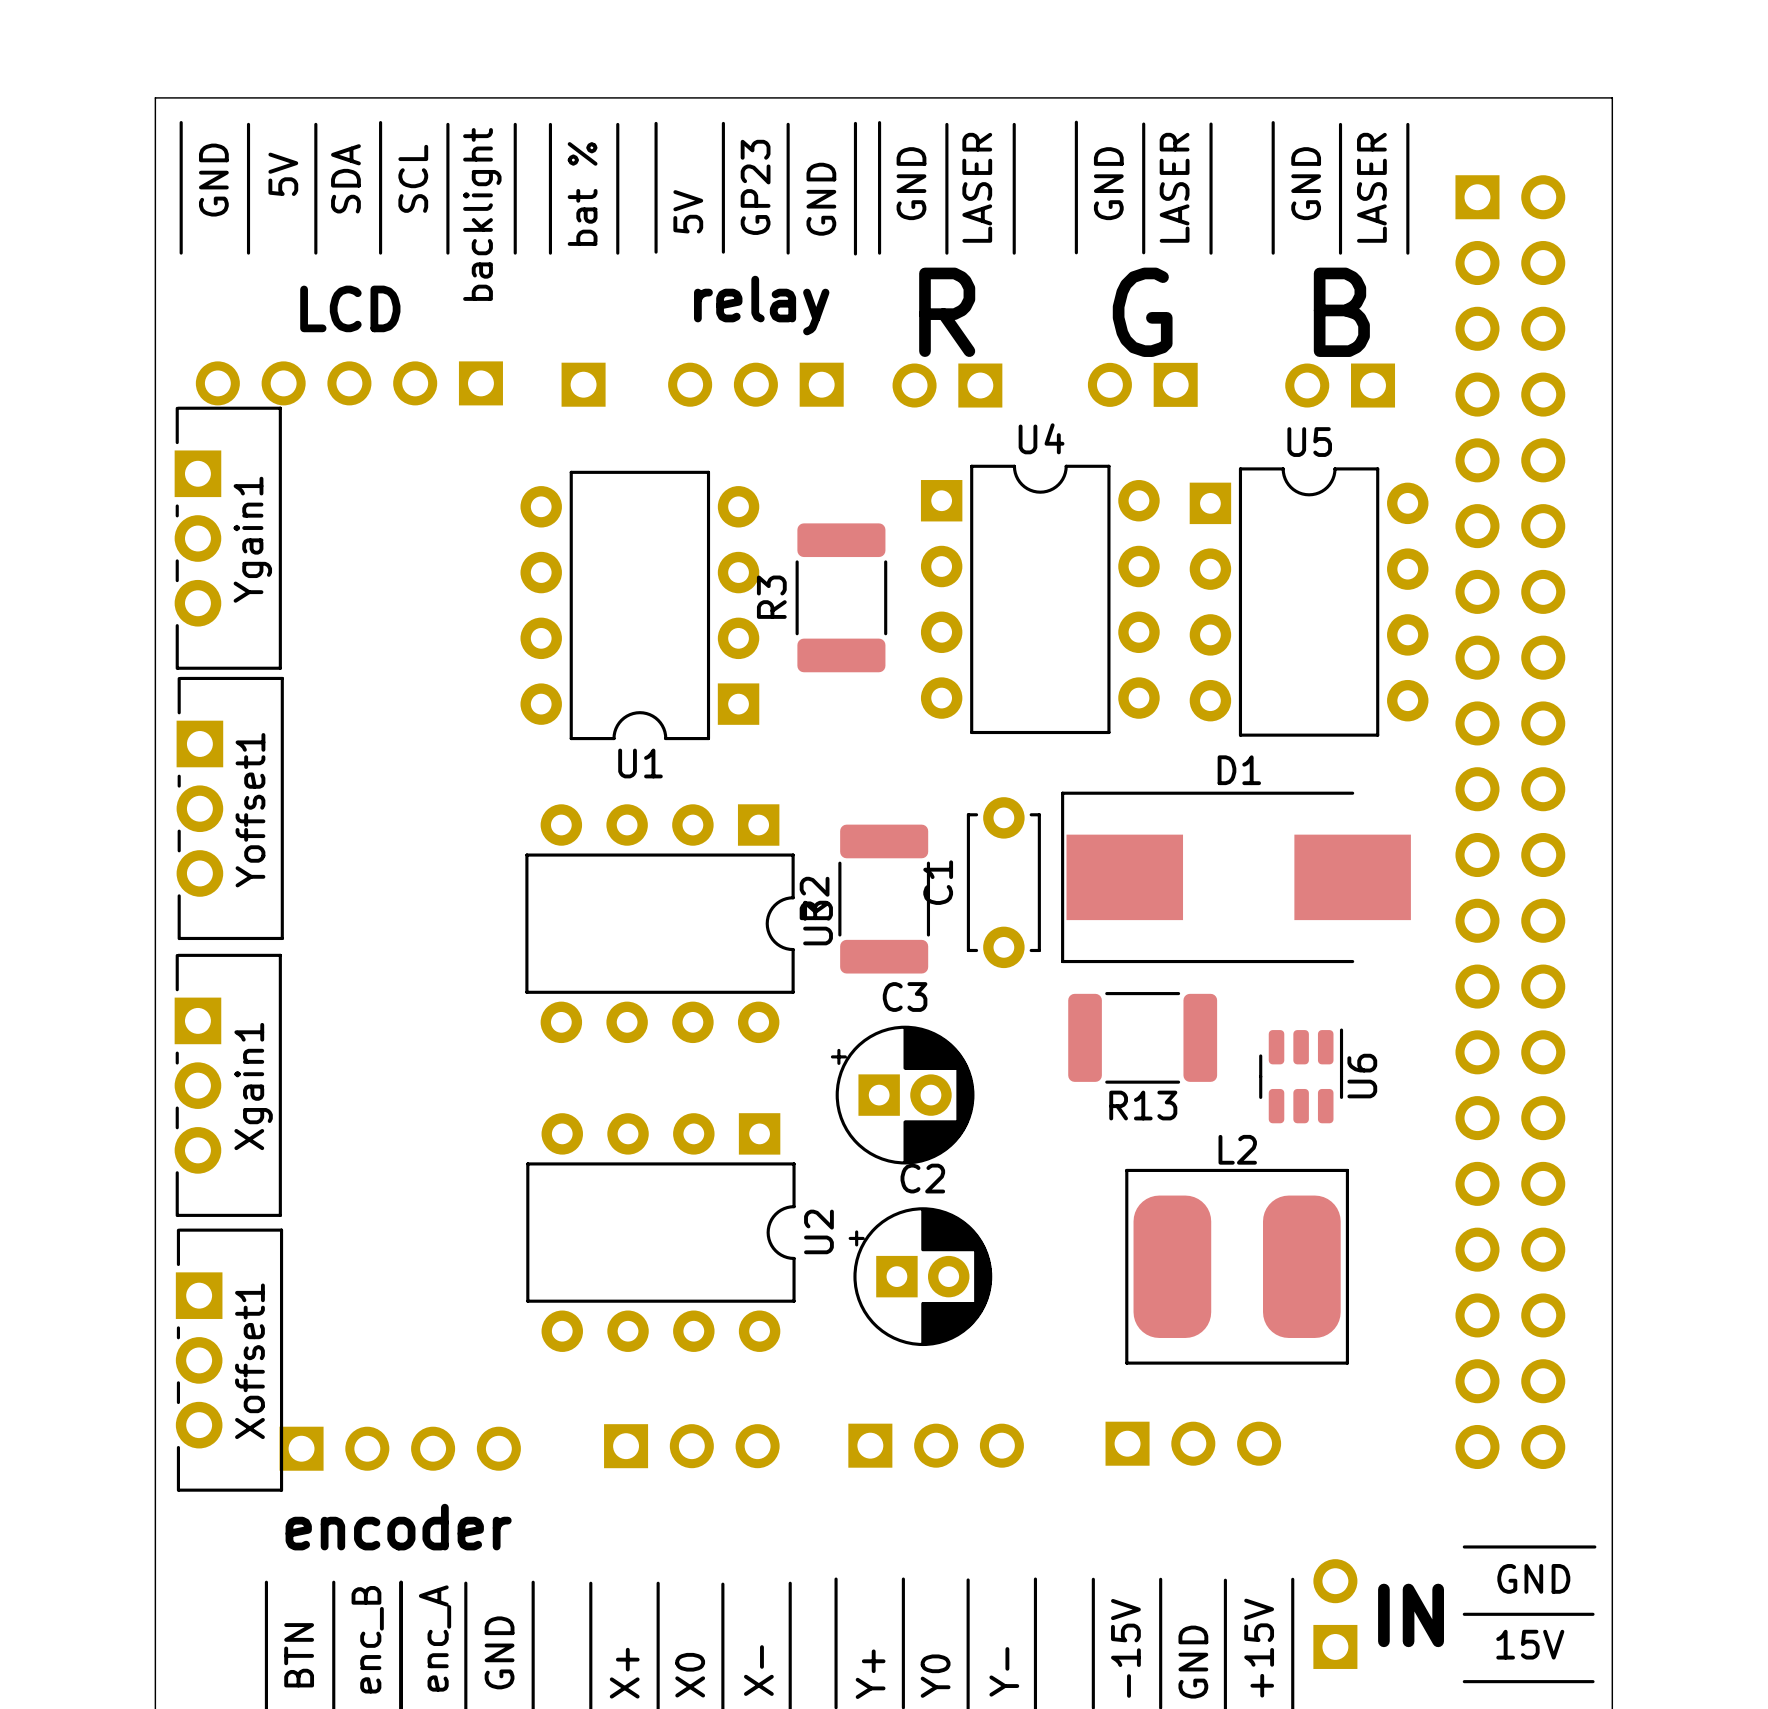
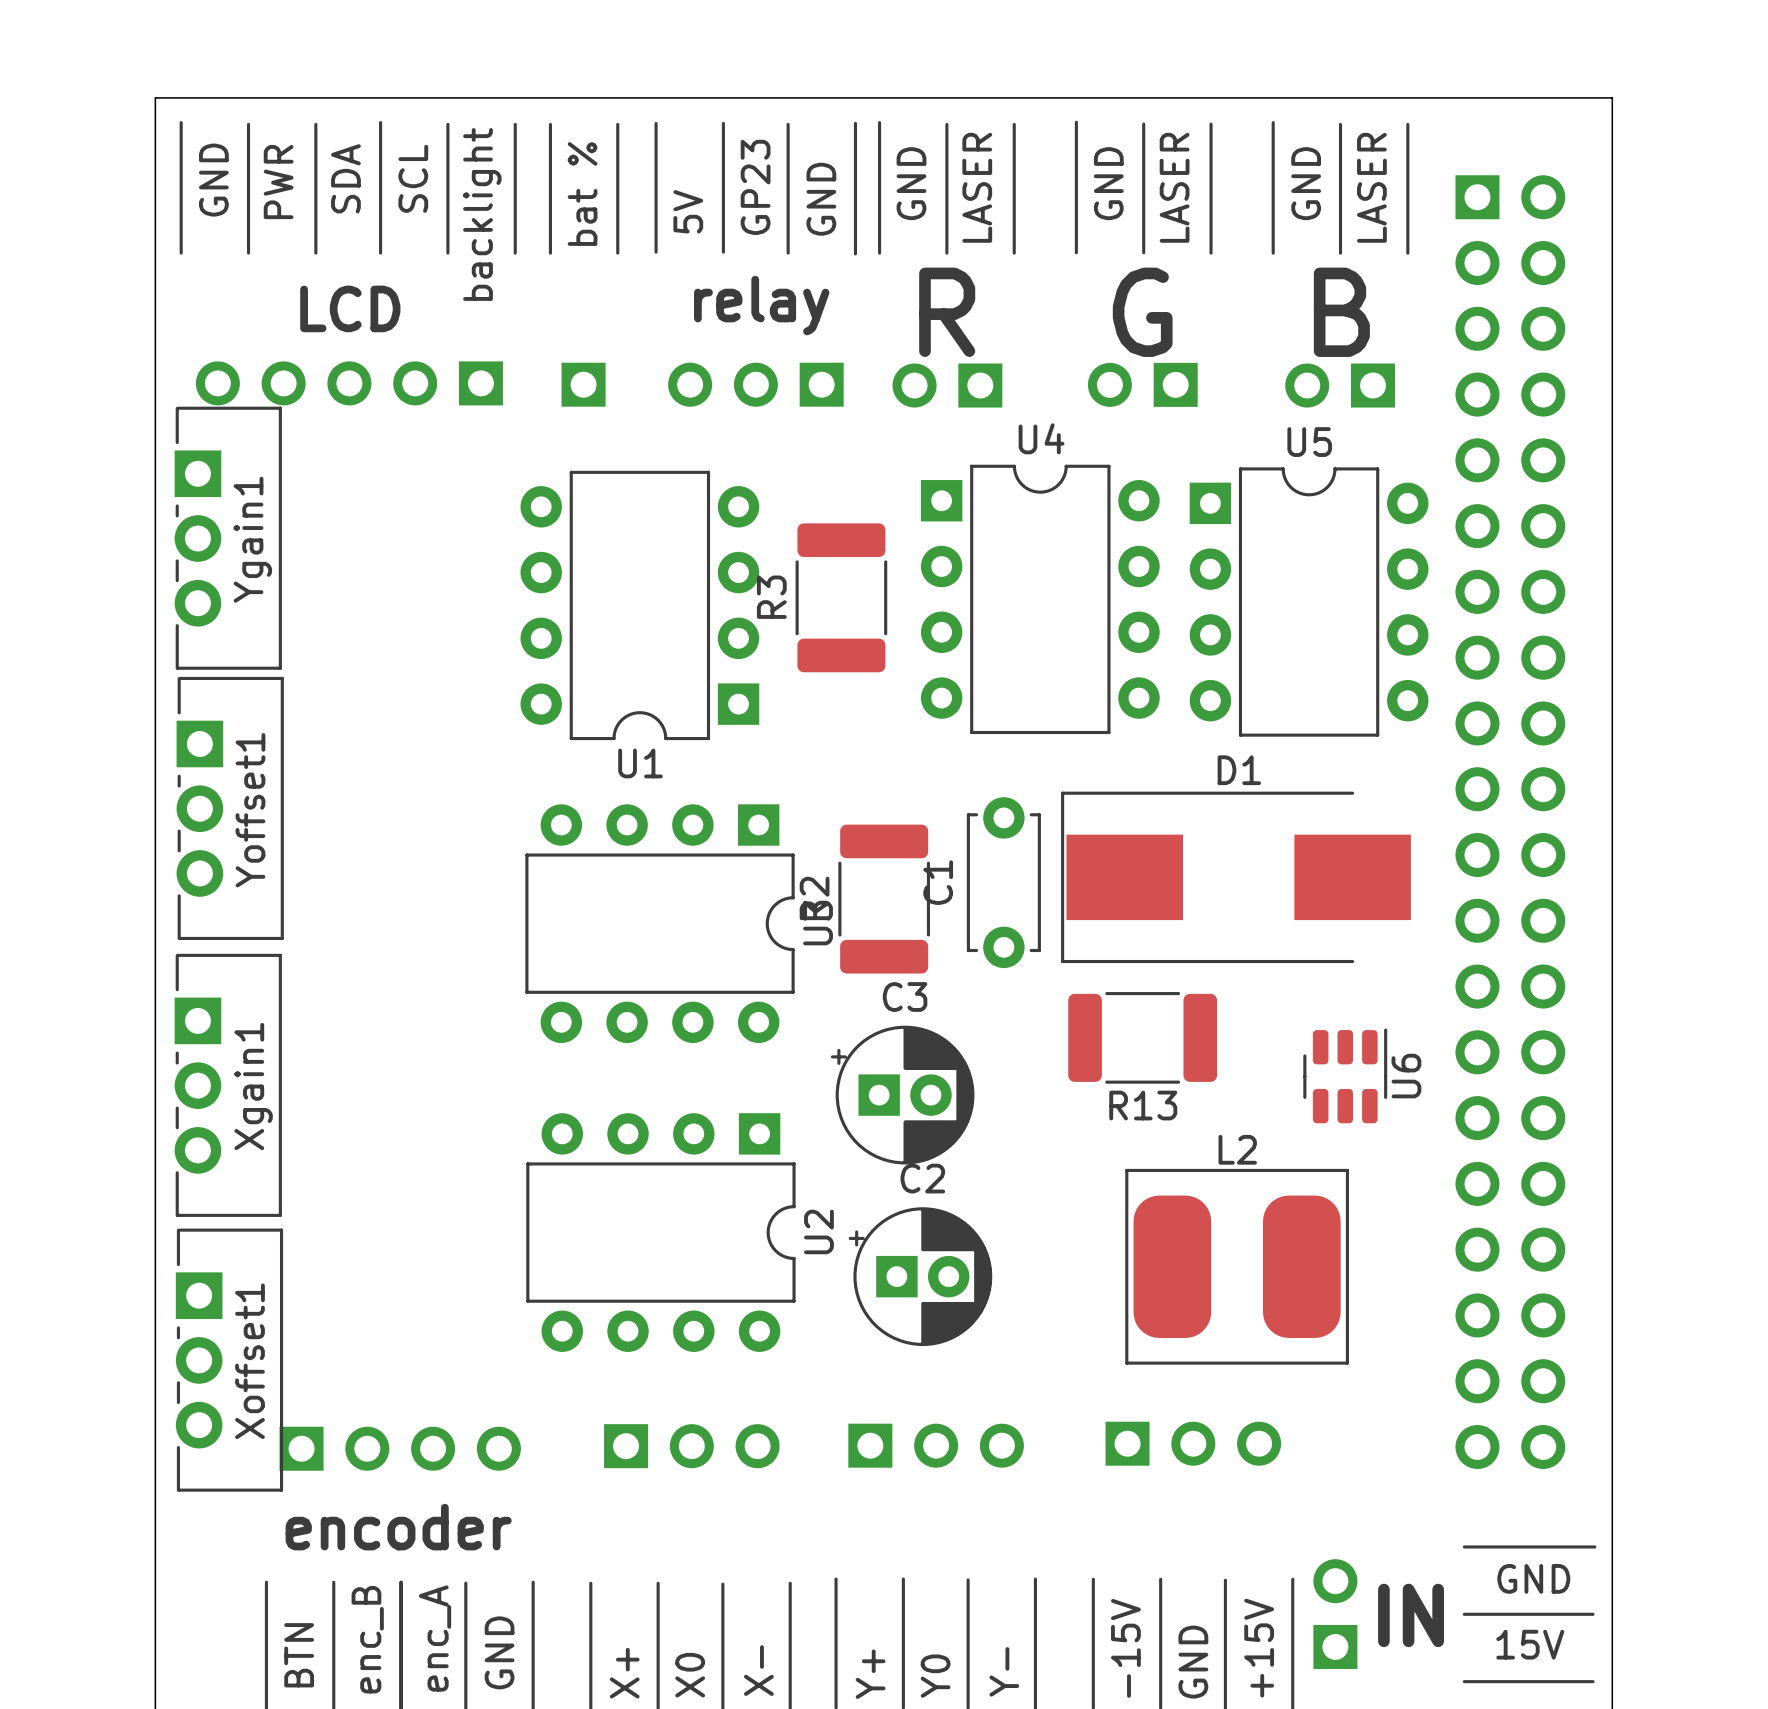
text: 5V (283, 174) -> PWR (278, 182)
U6 position: (1301, 1075) -> (1345, 1075)

